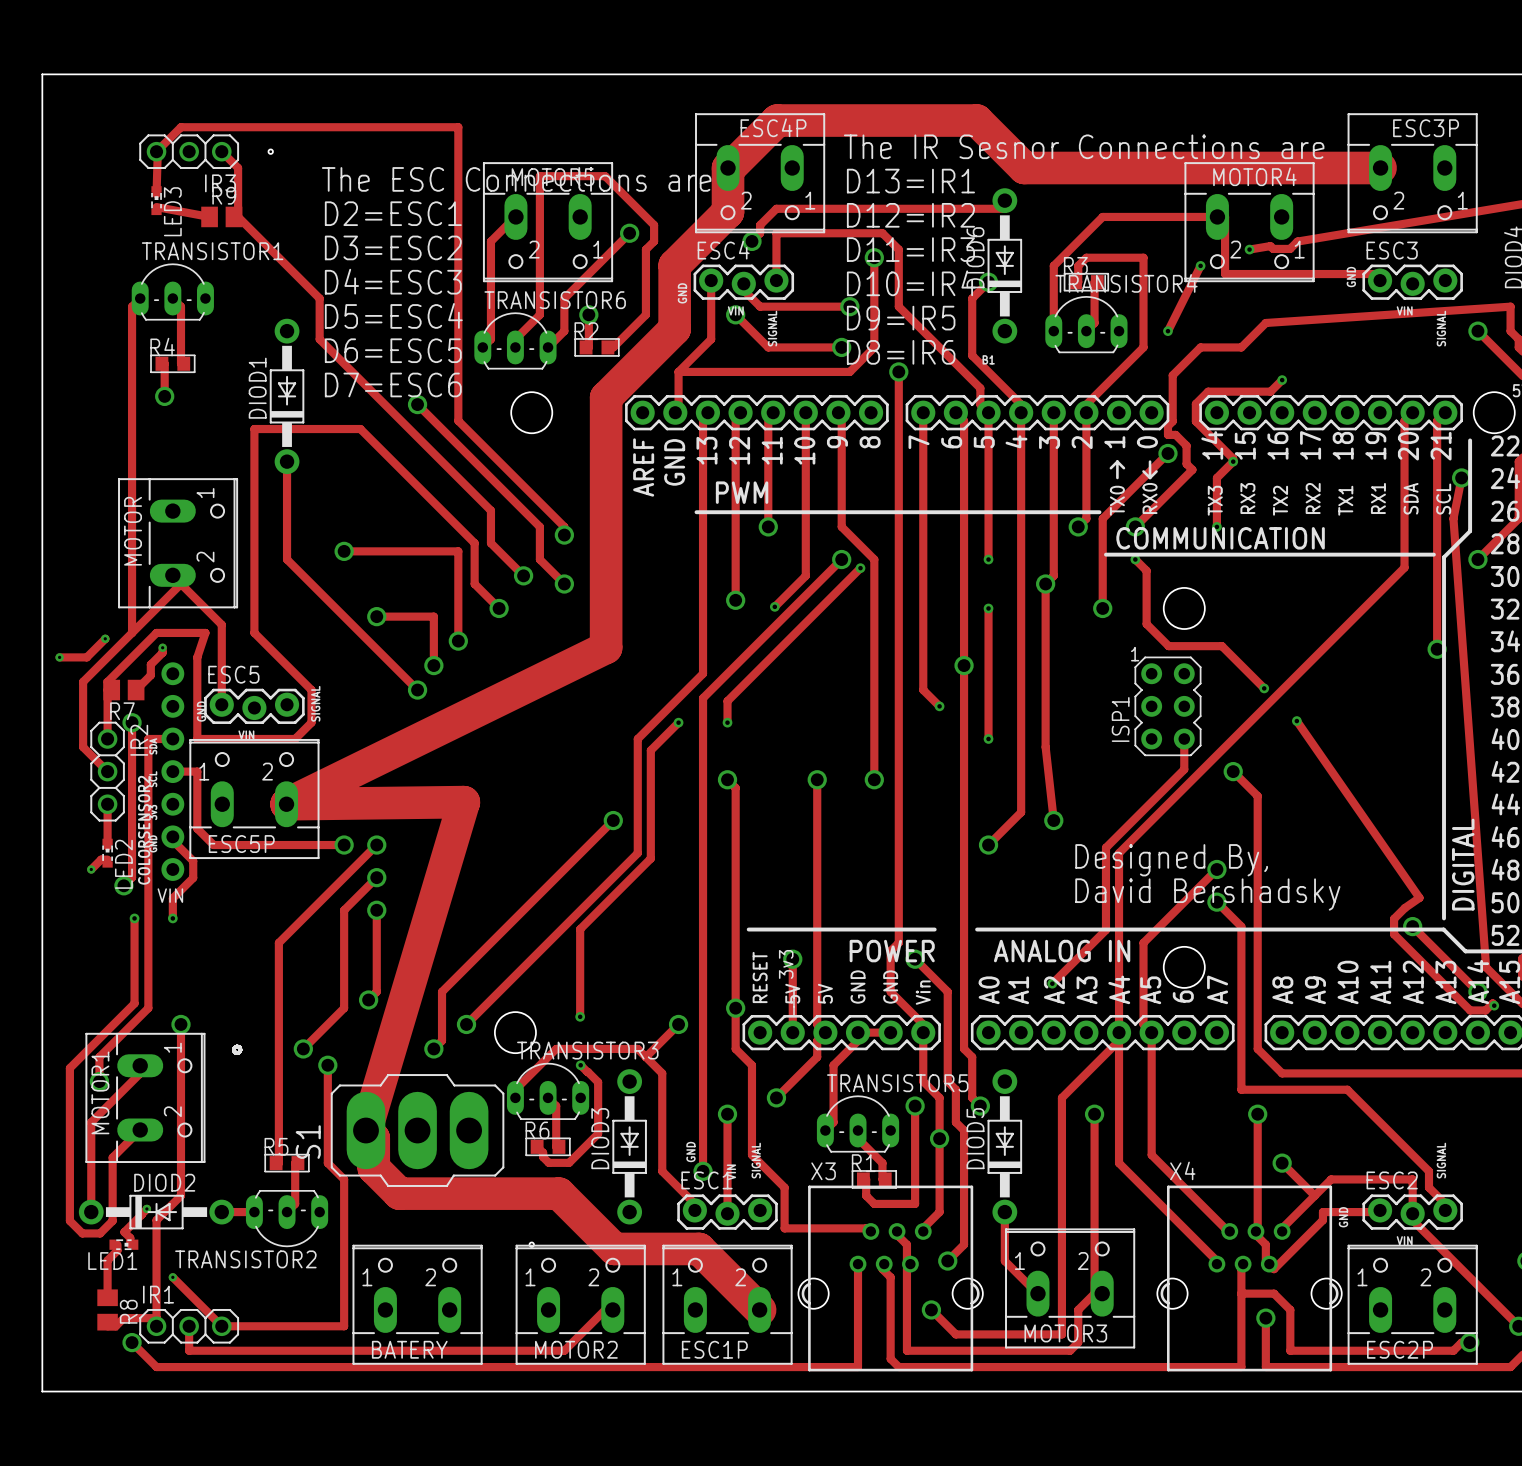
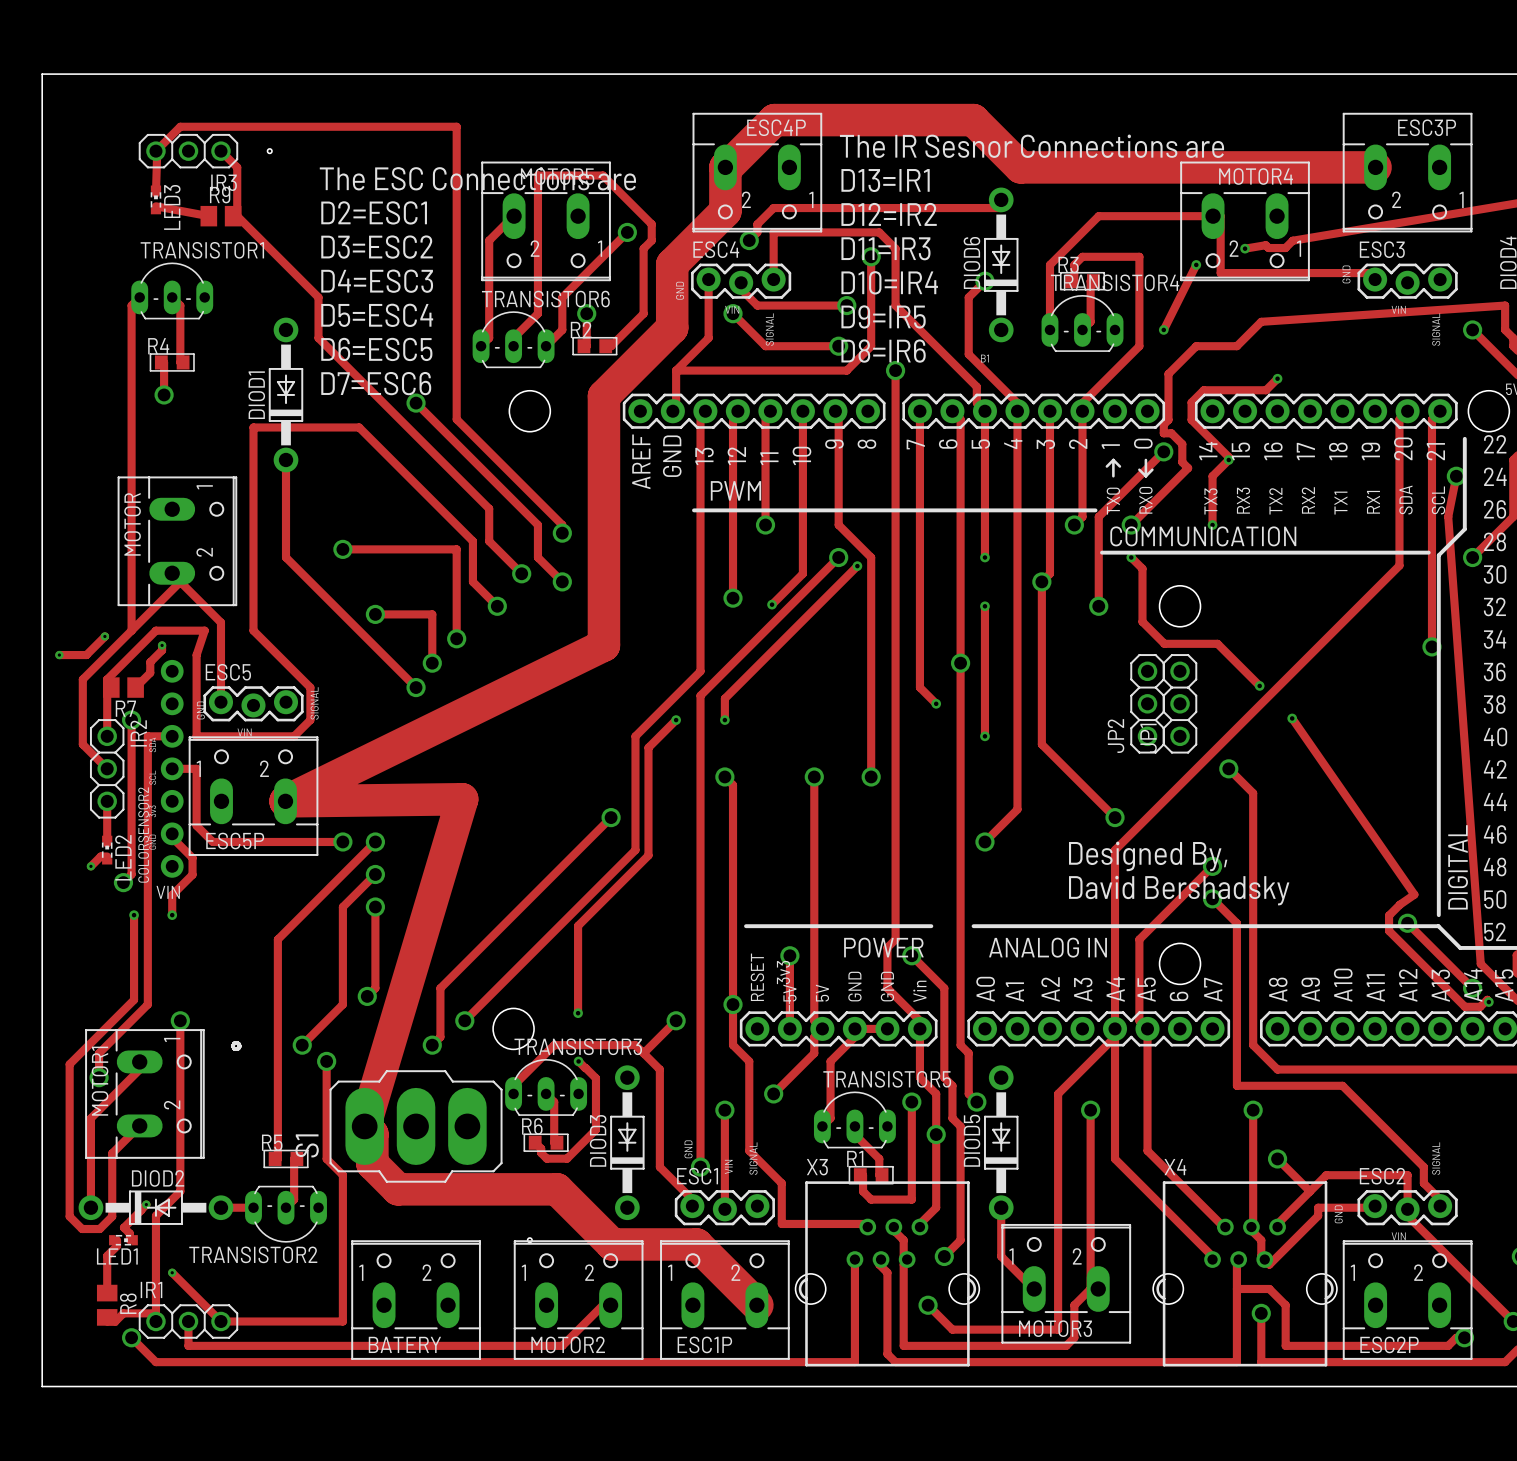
JP2: none -> (1147, 703)
ISP1: (1167, 706) -> none
JP1: none -> (1180, 703)
track: (1184, 738) (1184, 769) (1105, 847) (1105, 930) (1052, 983) -> none
track: (1045, 747) (1053, 820) -> (1041, 744) (1115, 817)
via position: (1053, 820) -> (1115, 817)
via: (1052, 983) -> none

